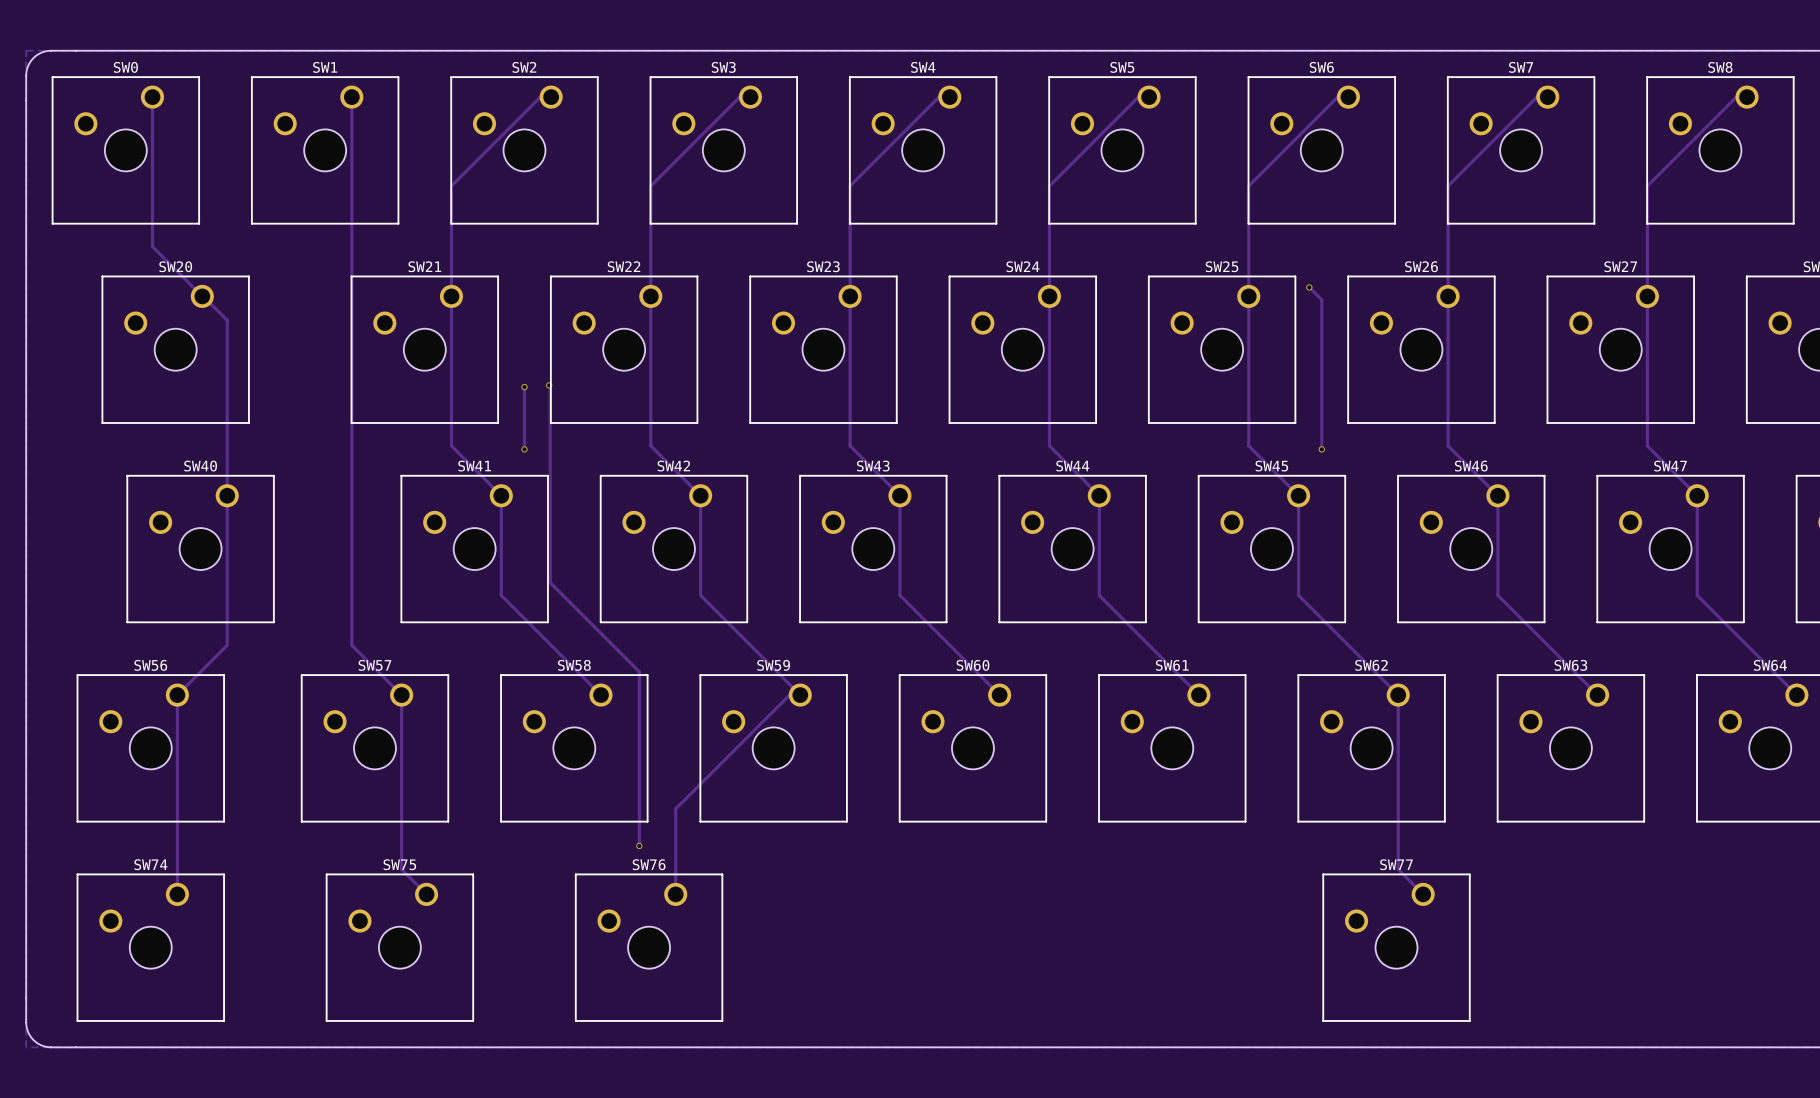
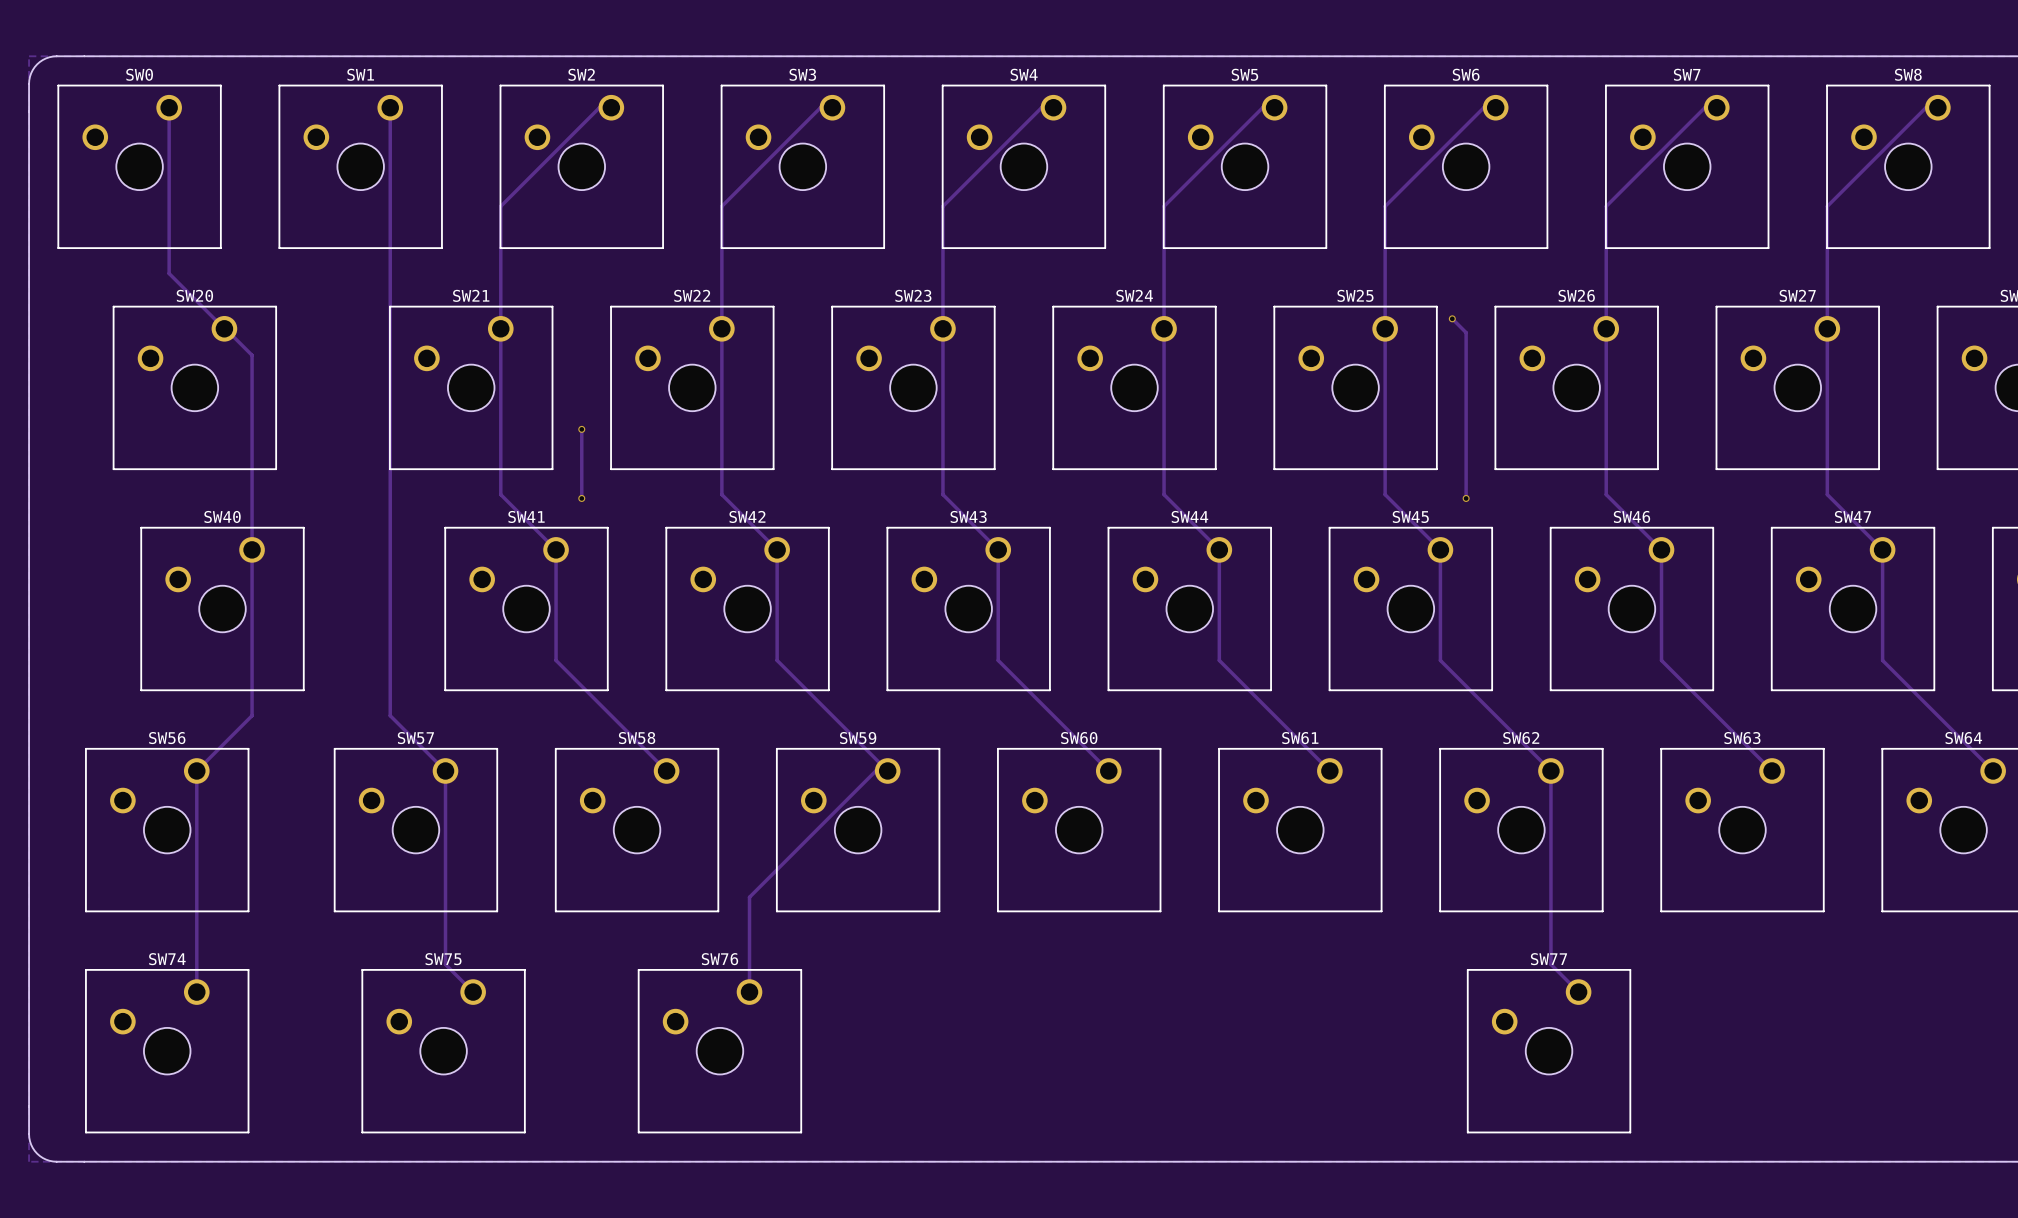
track: (549, 385) (550, 582) (639, 671) (639, 845) -> none
via: (549, 385) -> none
via: (639, 845) -> none

